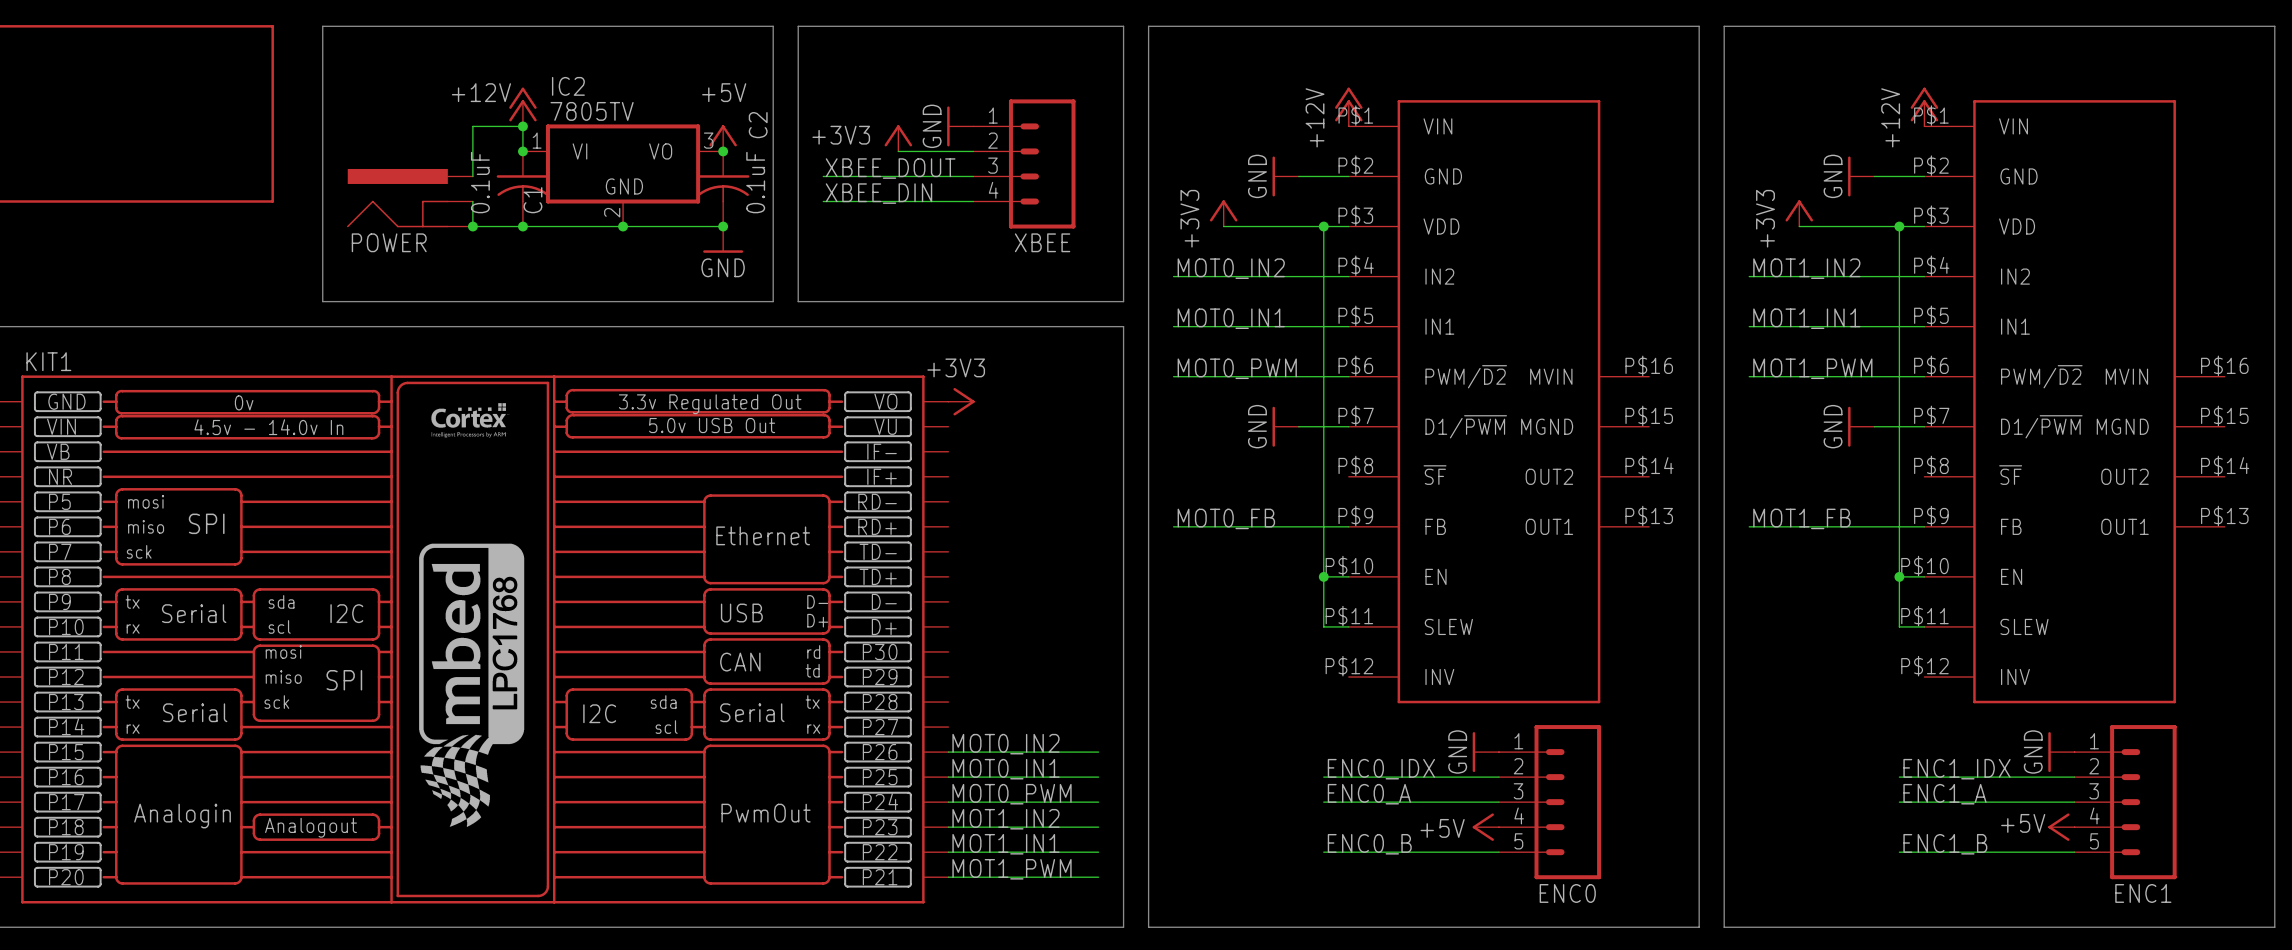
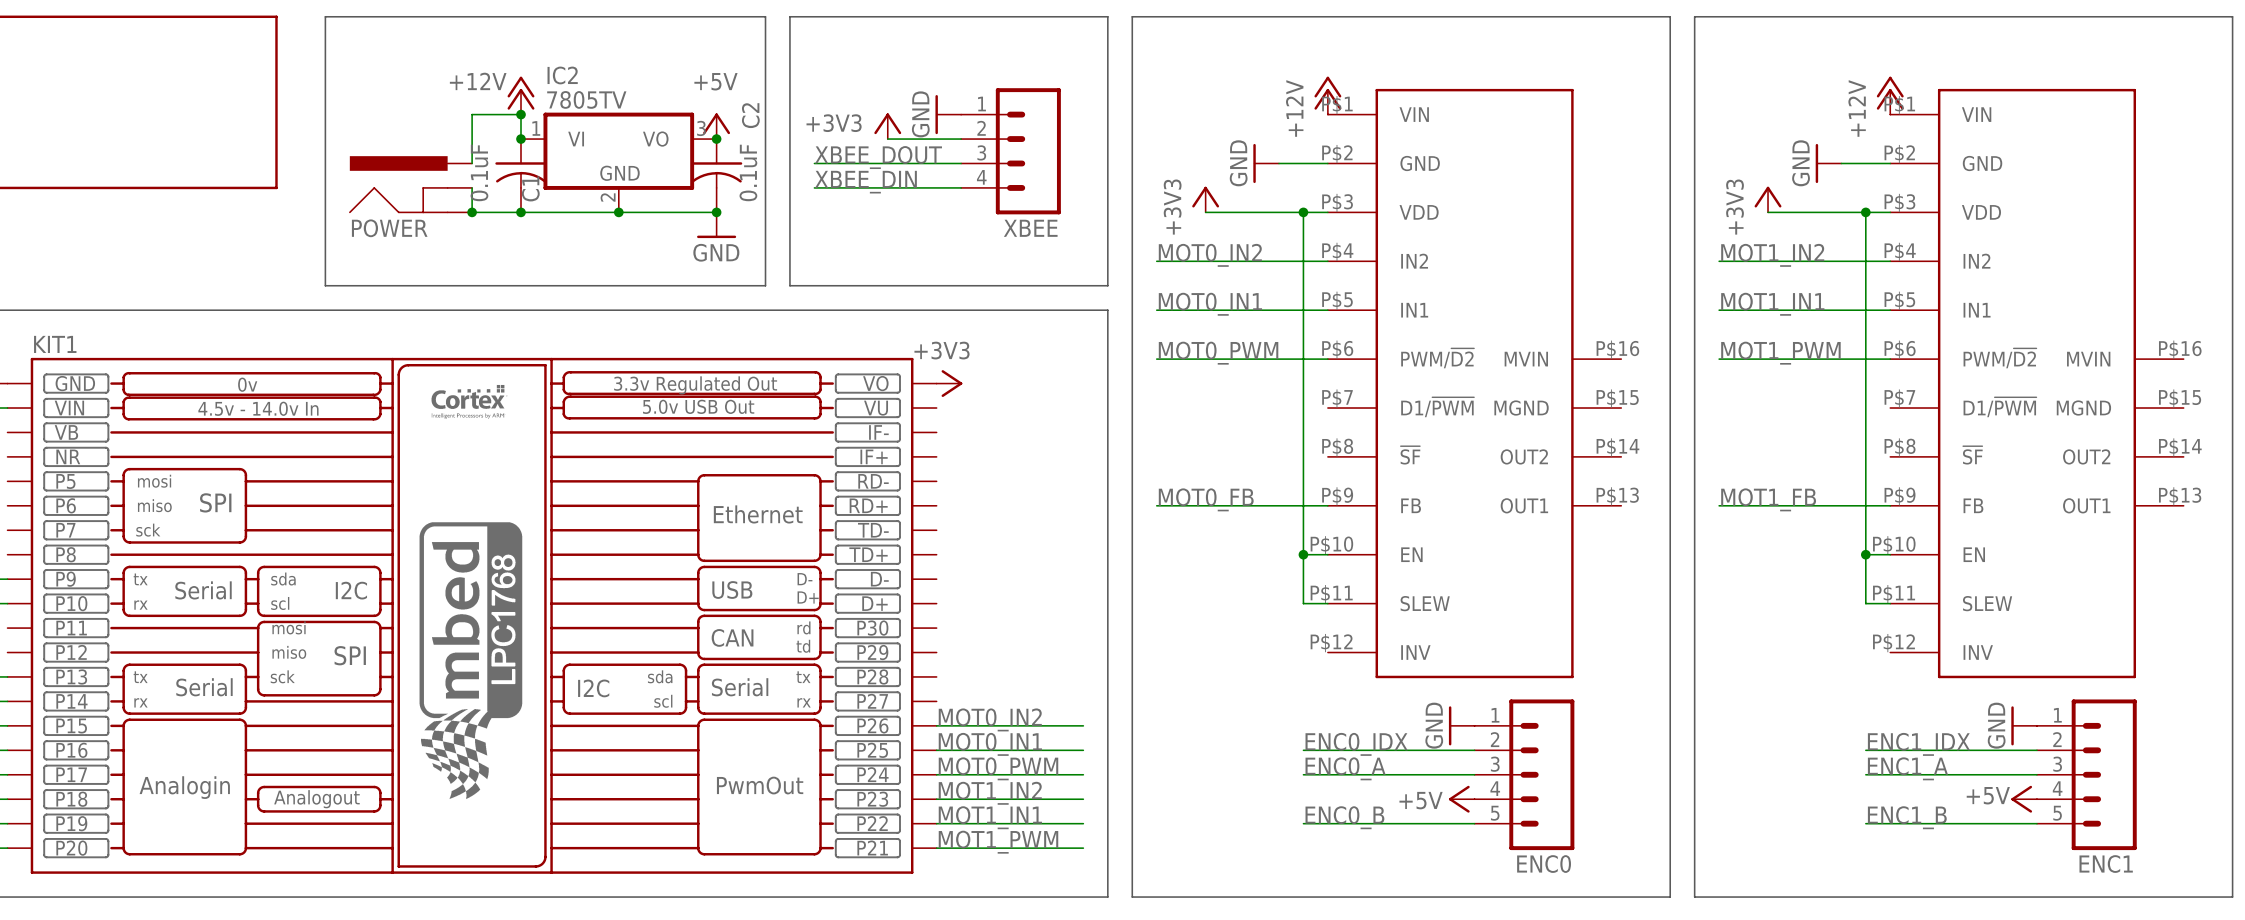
power symbol: GND (1285, 426) -> none
wire: (1298, 426) (1348, 426) -> none
power symbol: GND (1861, 426) -> none
wire: (1874, 426) (1924, 426) -> none

